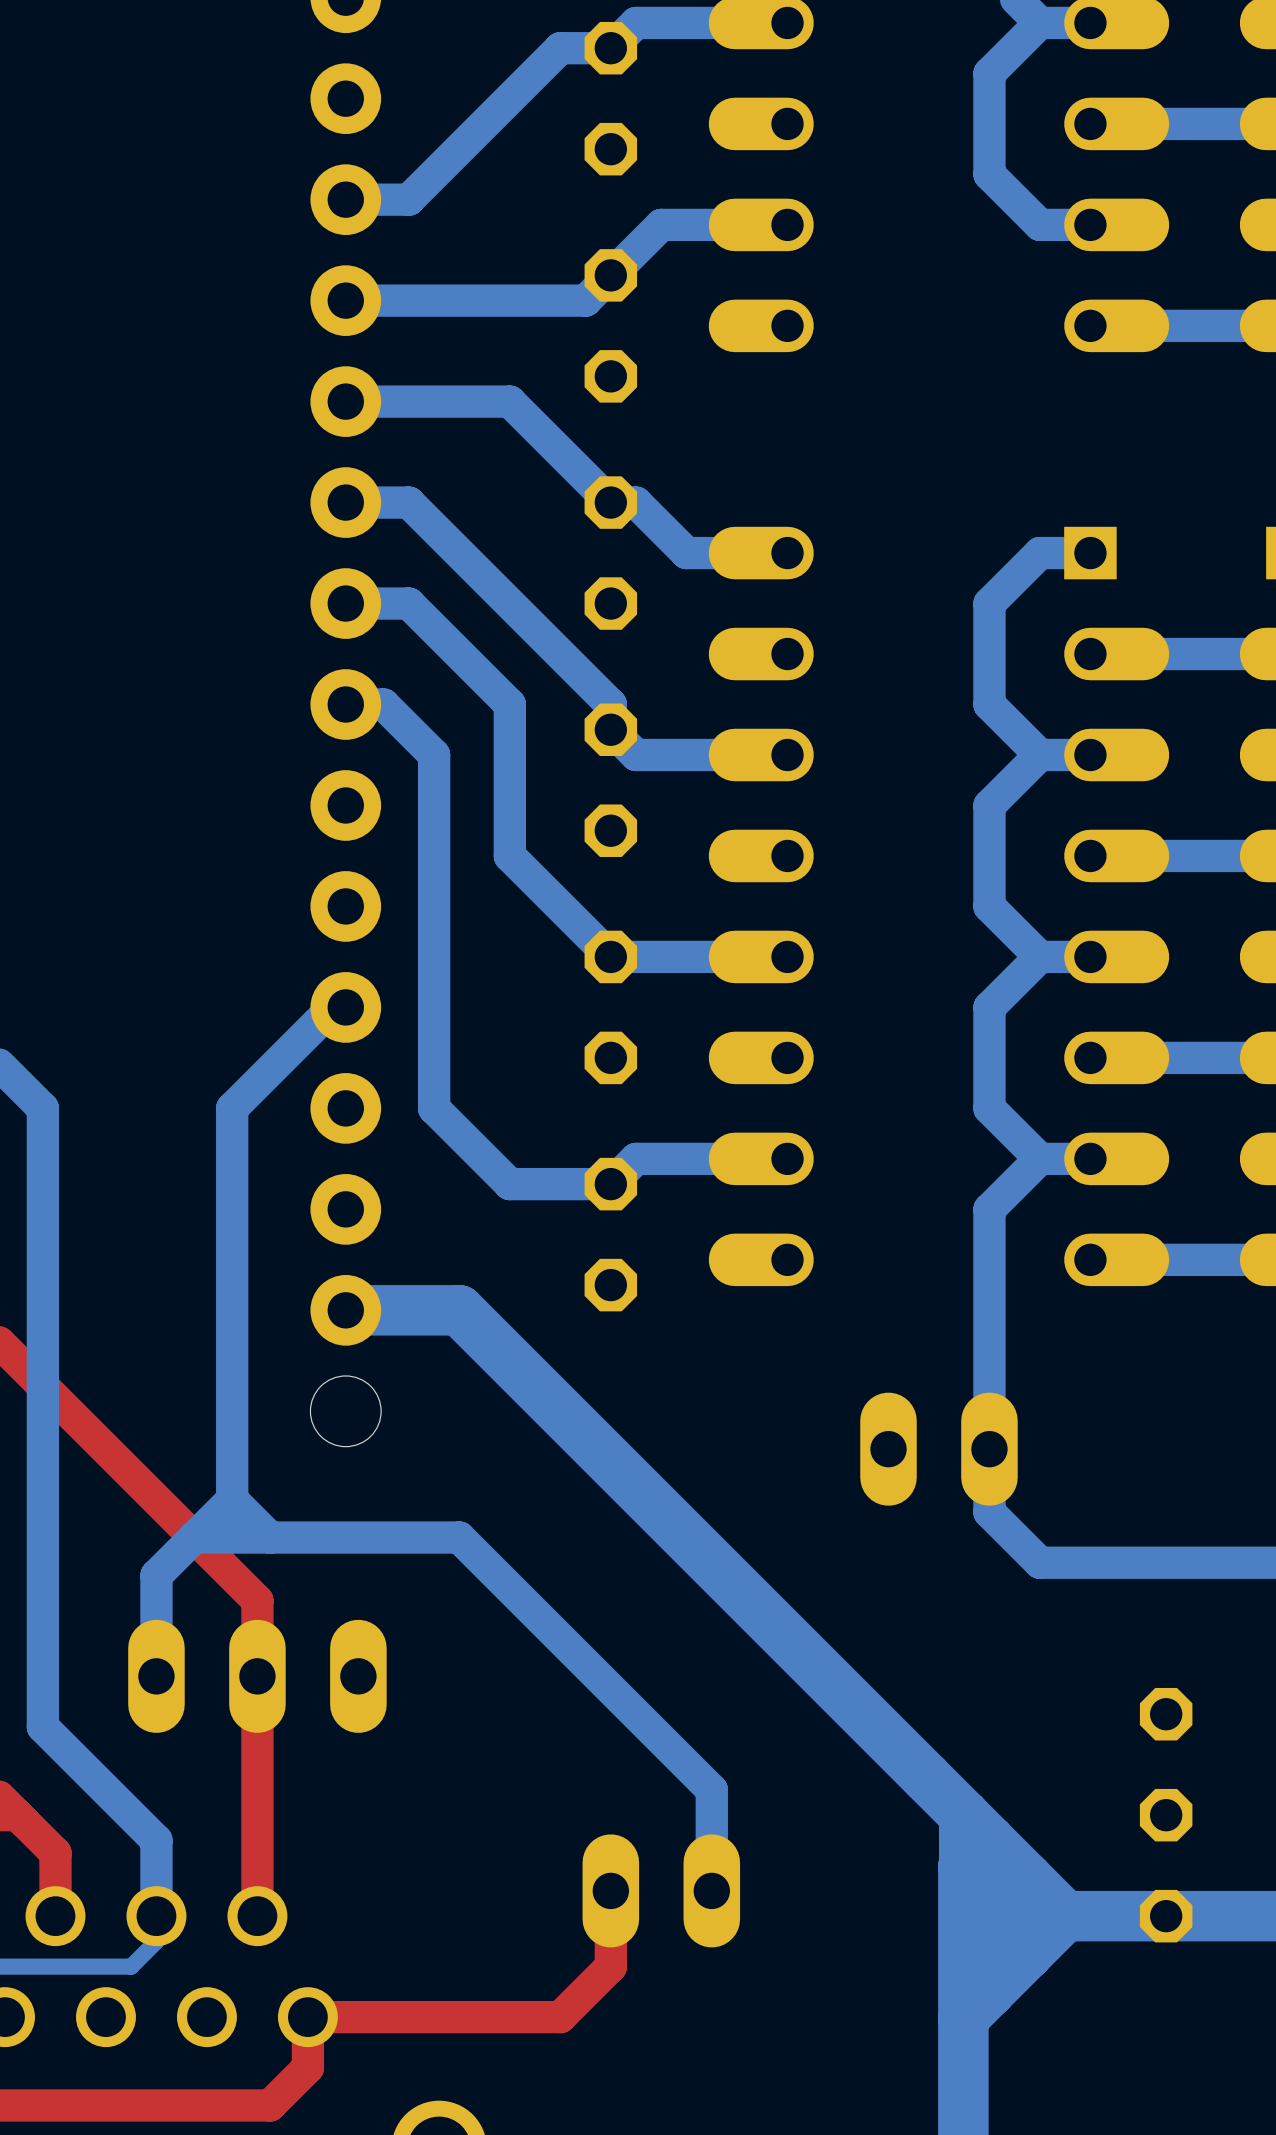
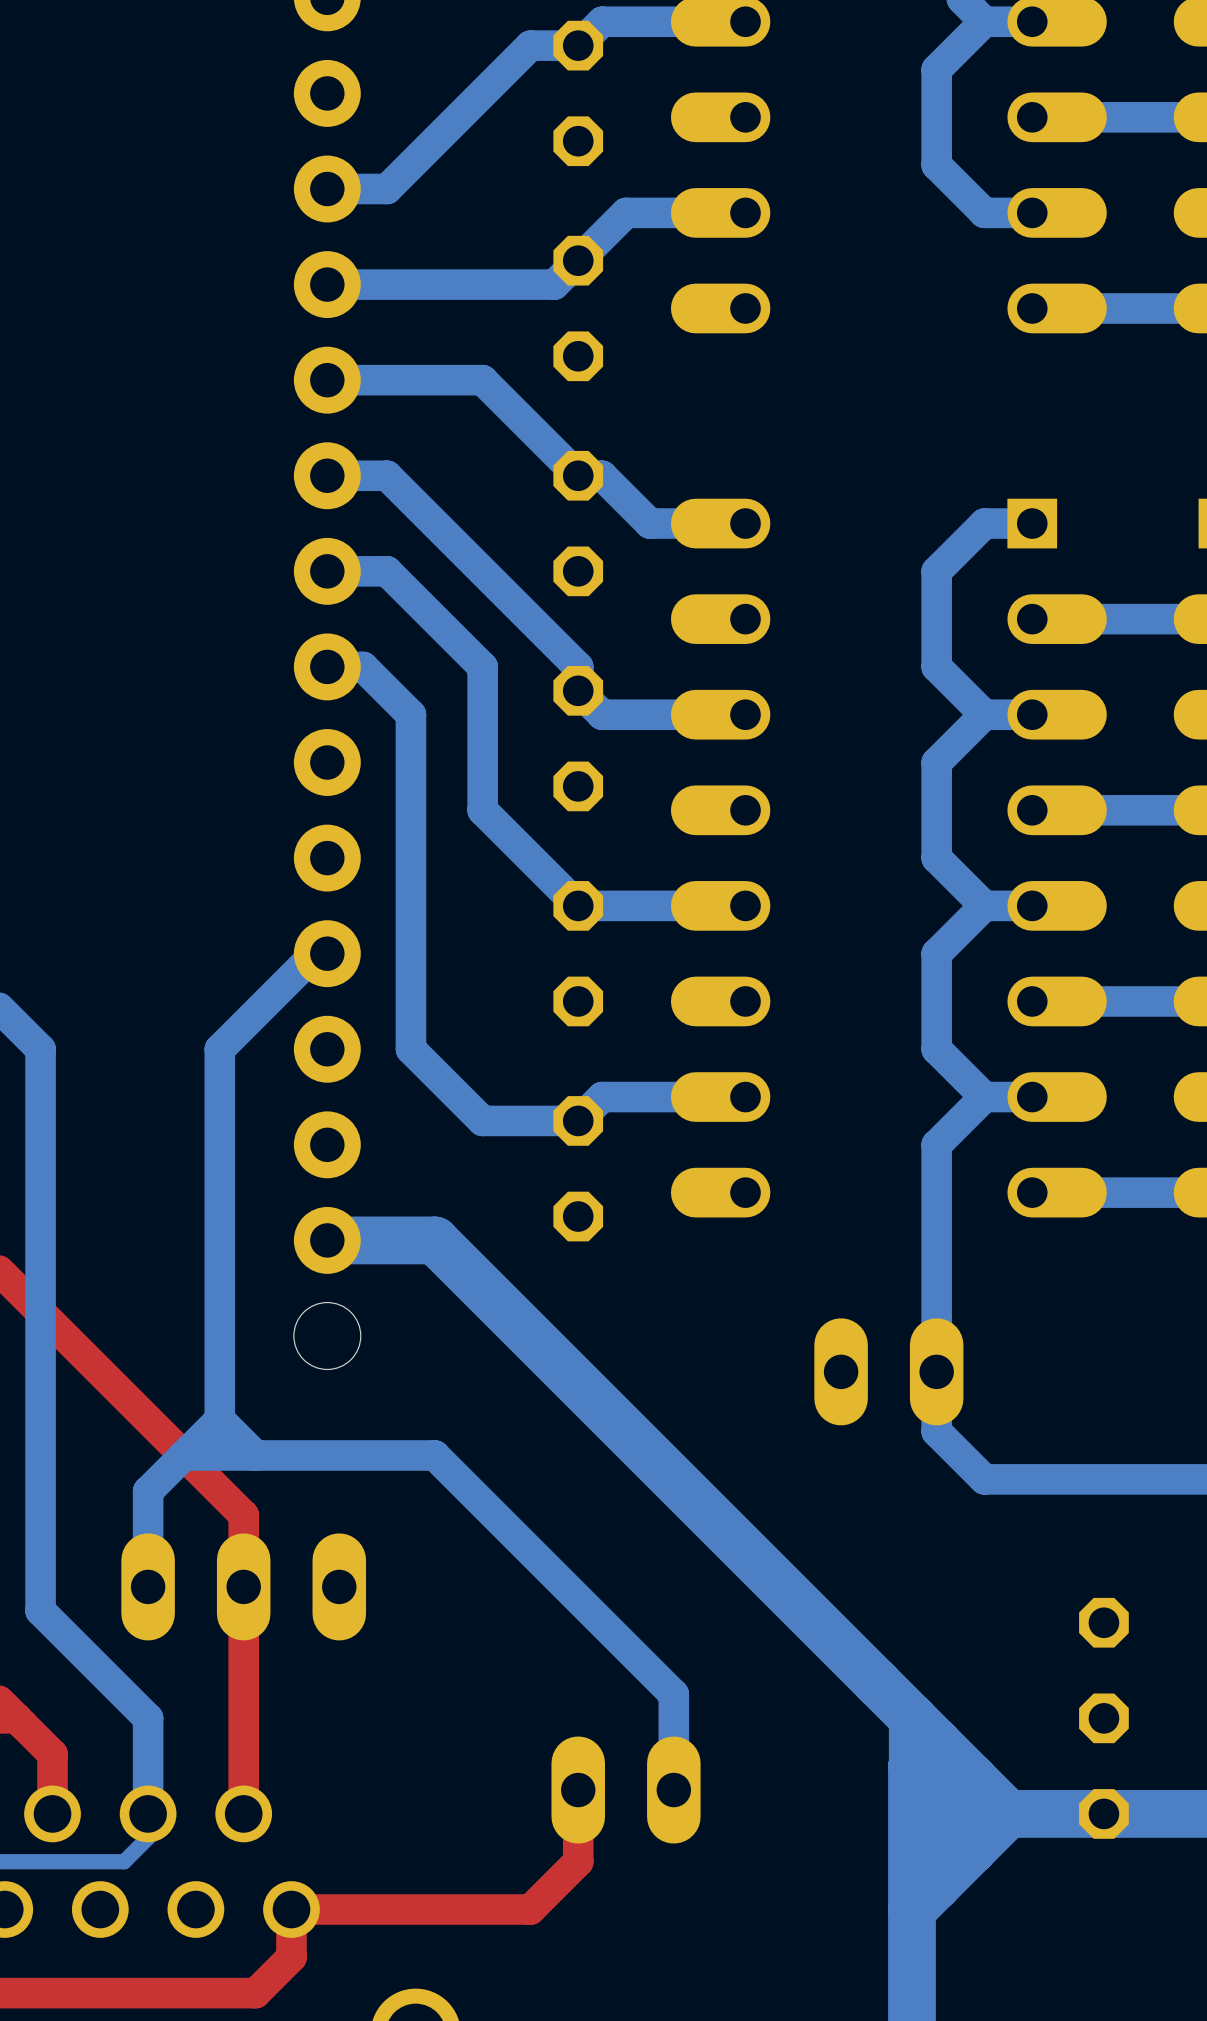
bottom track: (42, 1701) (42, 1726) (156, 1840) -> (40, 1610) (148, 1718) (148, 1742)

